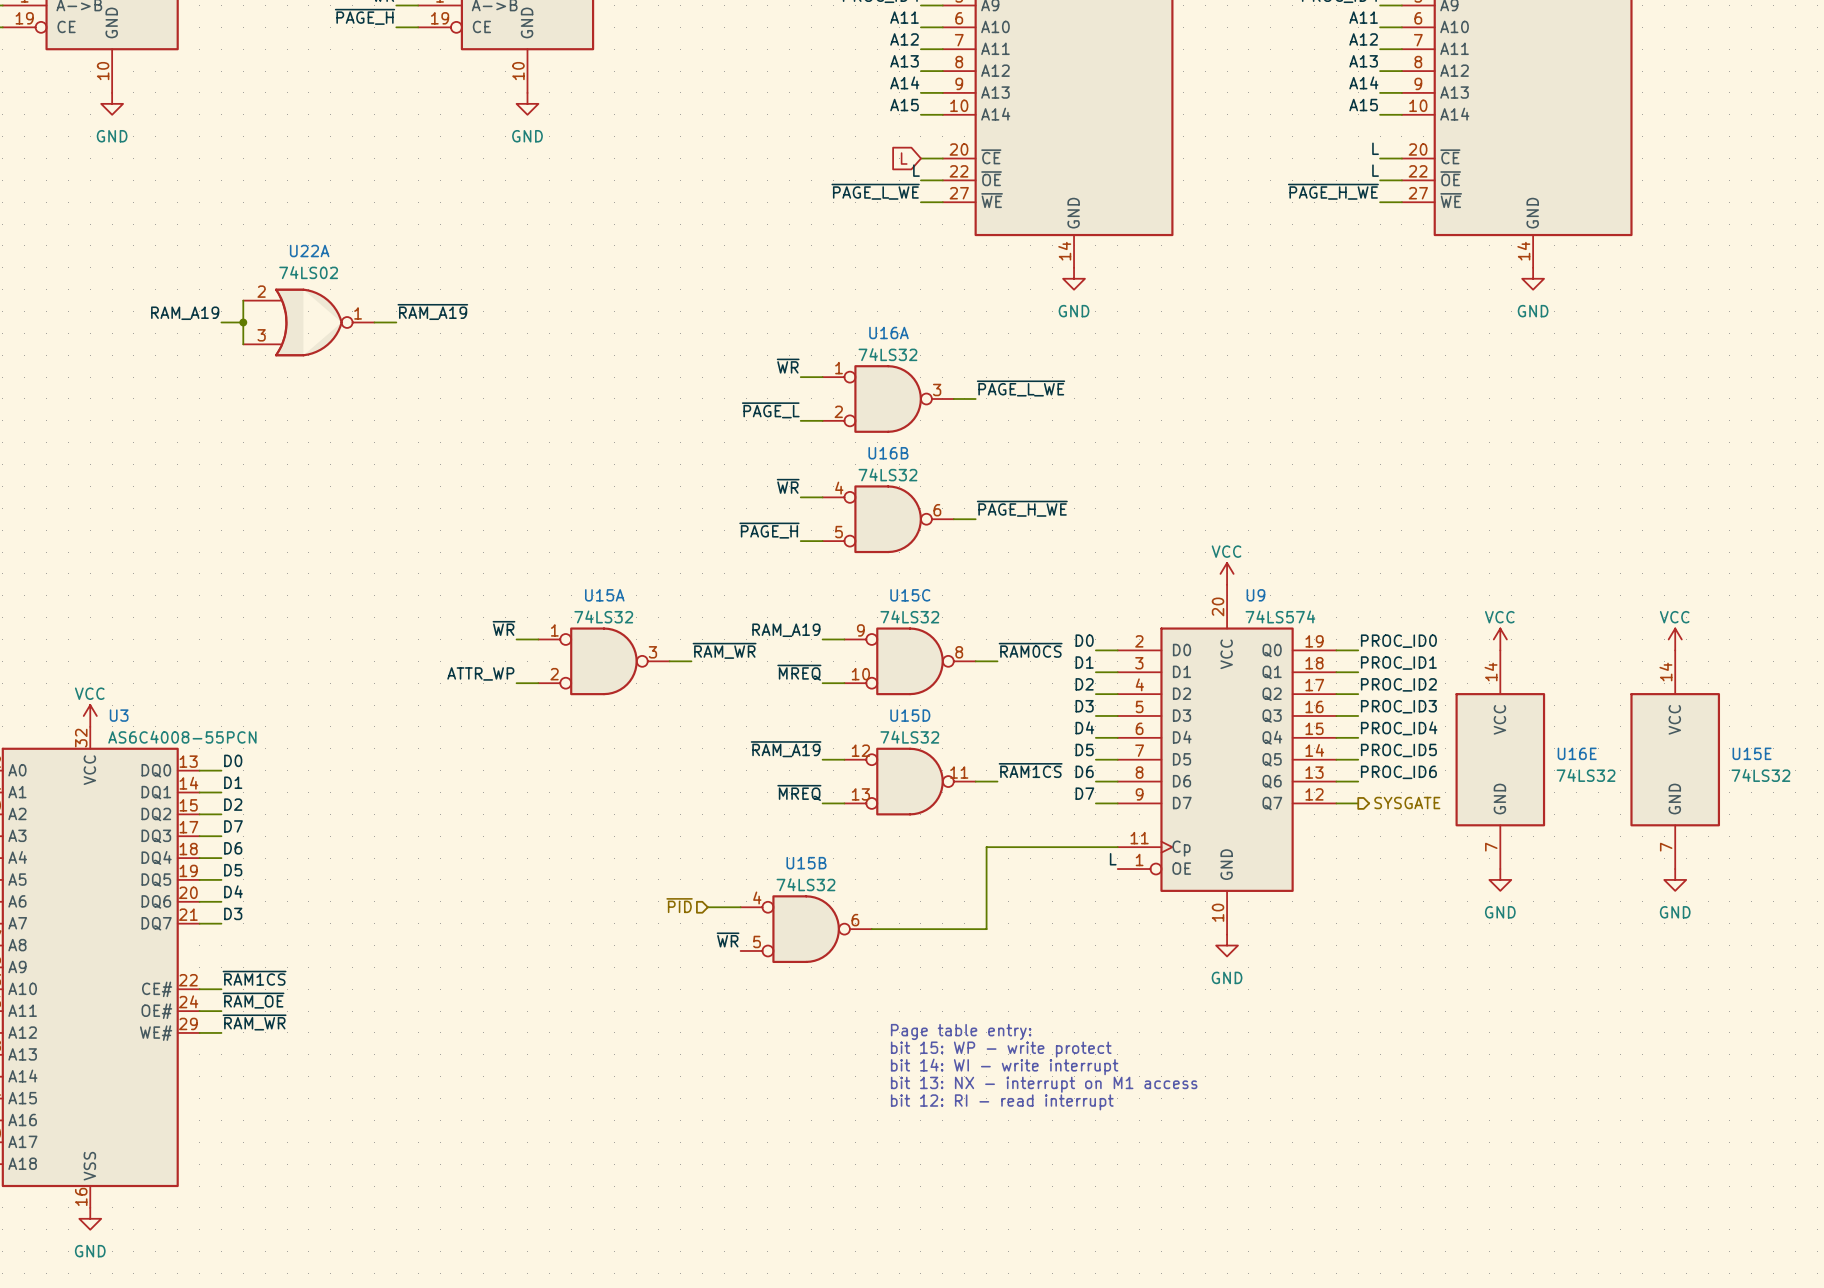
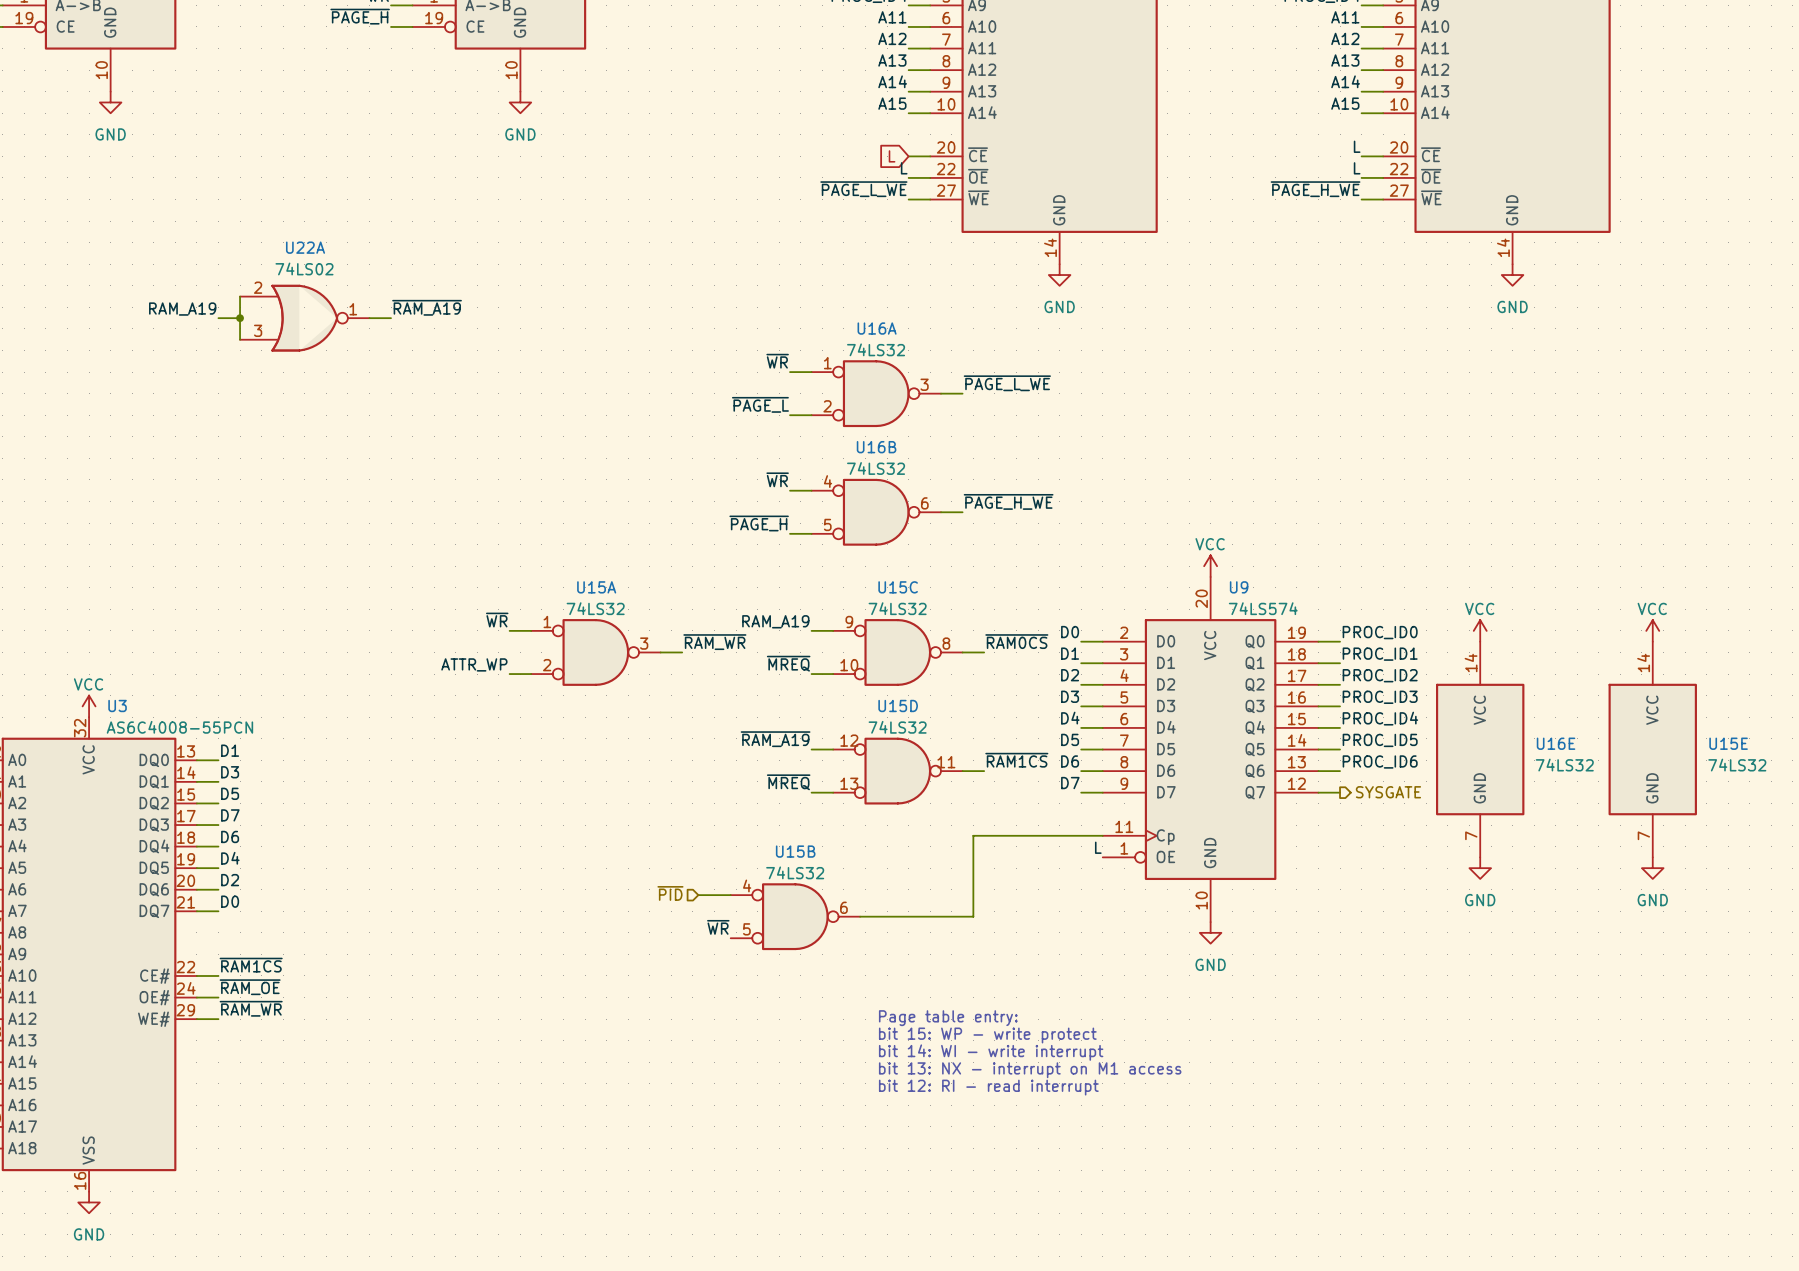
label: D0 (233, 760) -> D1 (230, 750)
label: D1 (233, 782) -> D3 (230, 772)
label: D2 (233, 804) -> D5 (230, 793)
label: D5 (233, 870) -> D4 (230, 858)
label: D4 (233, 891) -> D2 (230, 880)
label: D3 (233, 913) -> D0 (230, 901)

